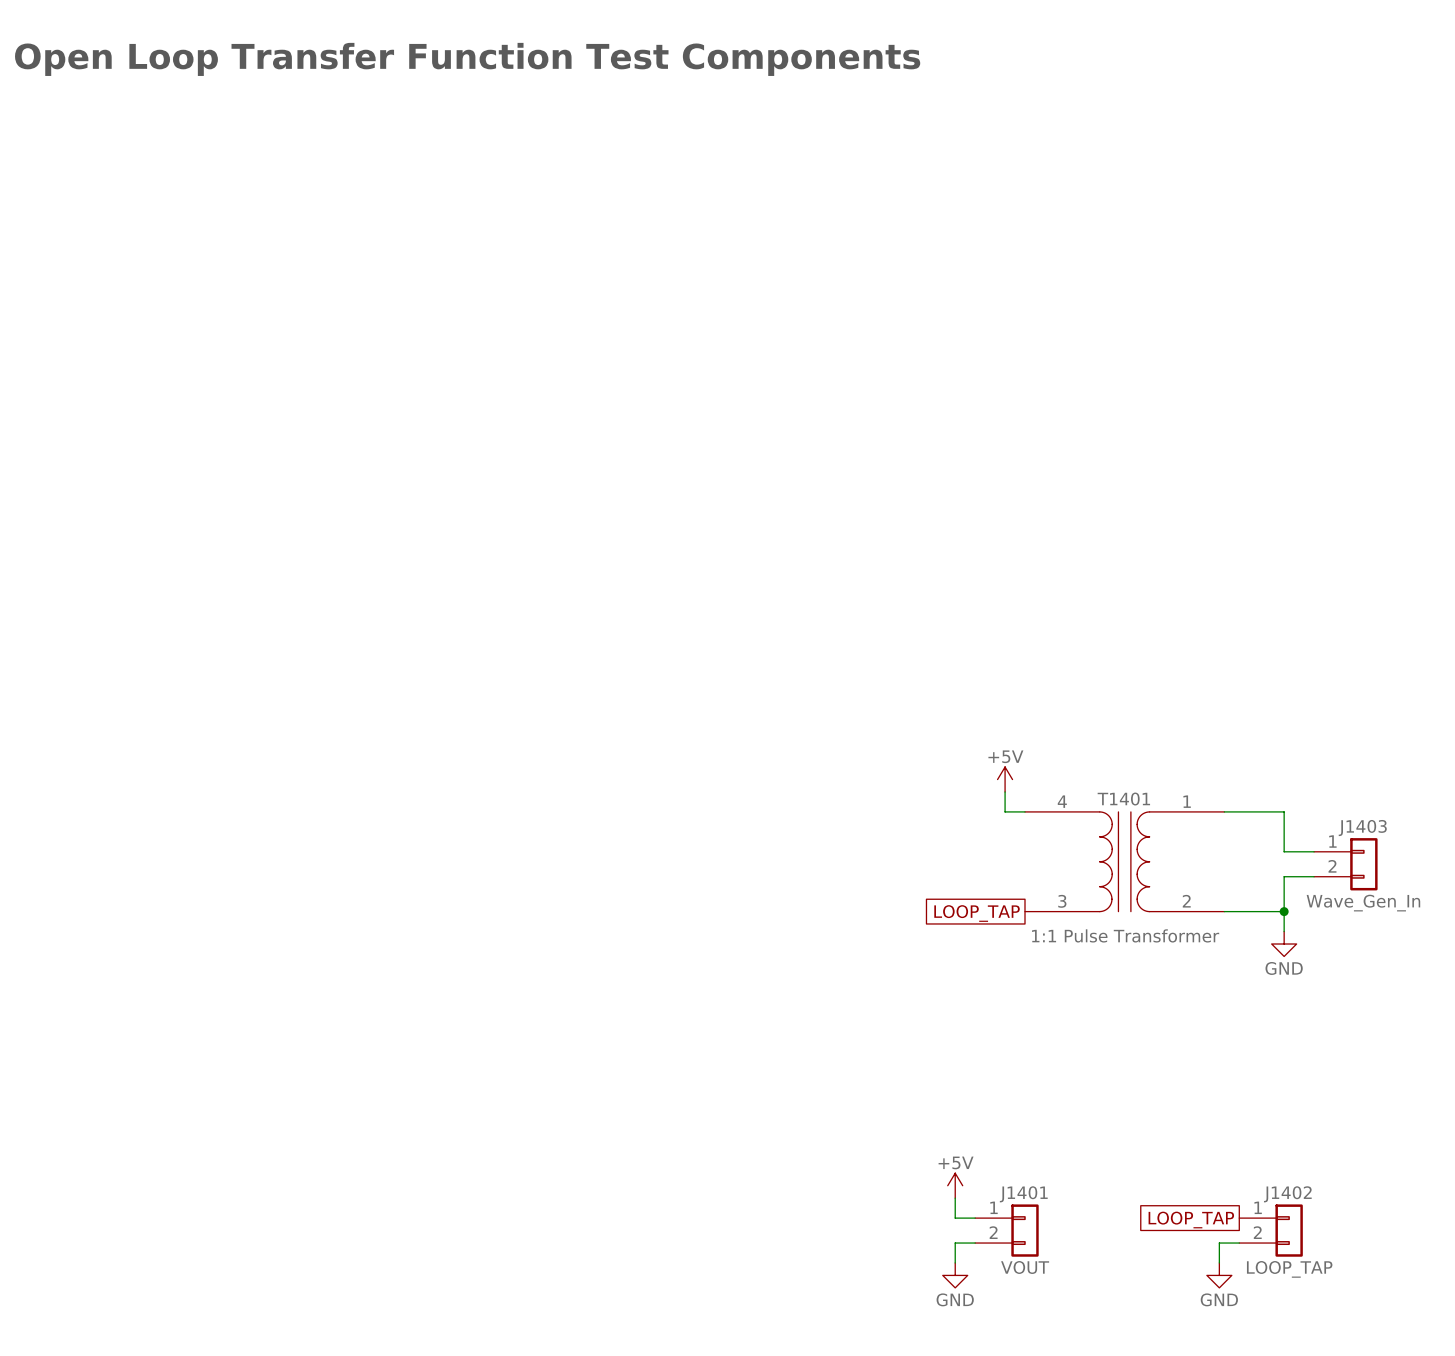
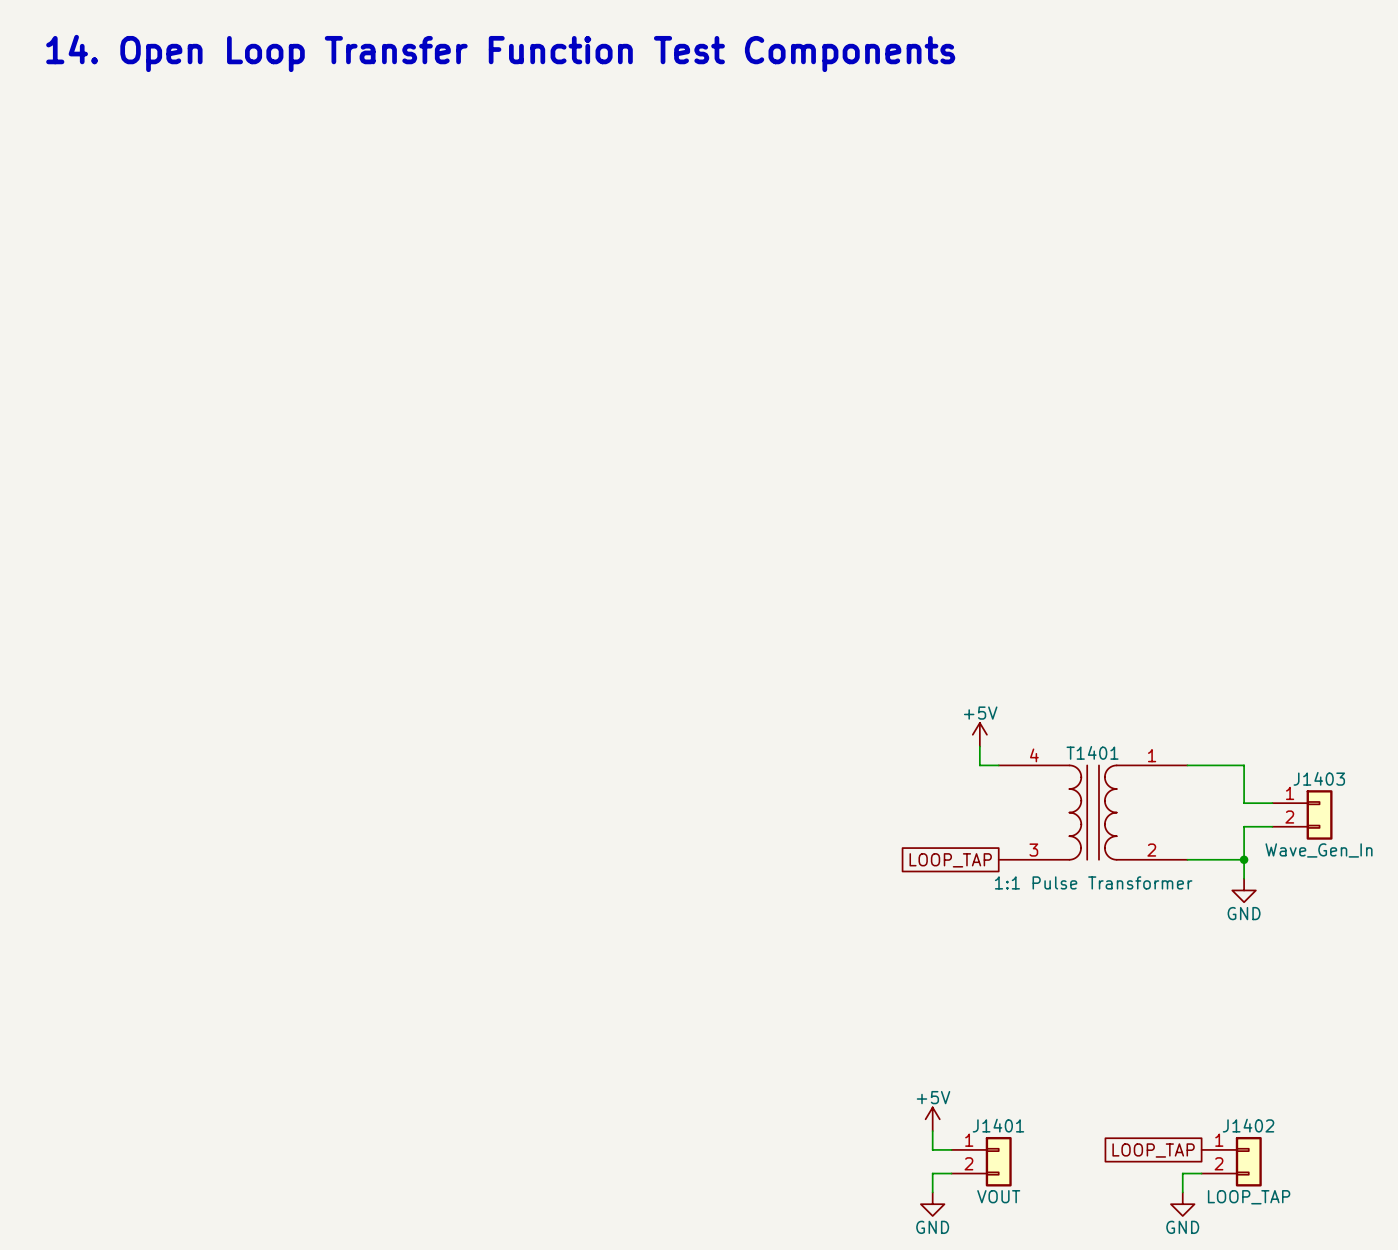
text: Open Loop Transfer Function Test Components (467, 59) -> 14. Open Loop Transfer Function Test Components (500, 53)

